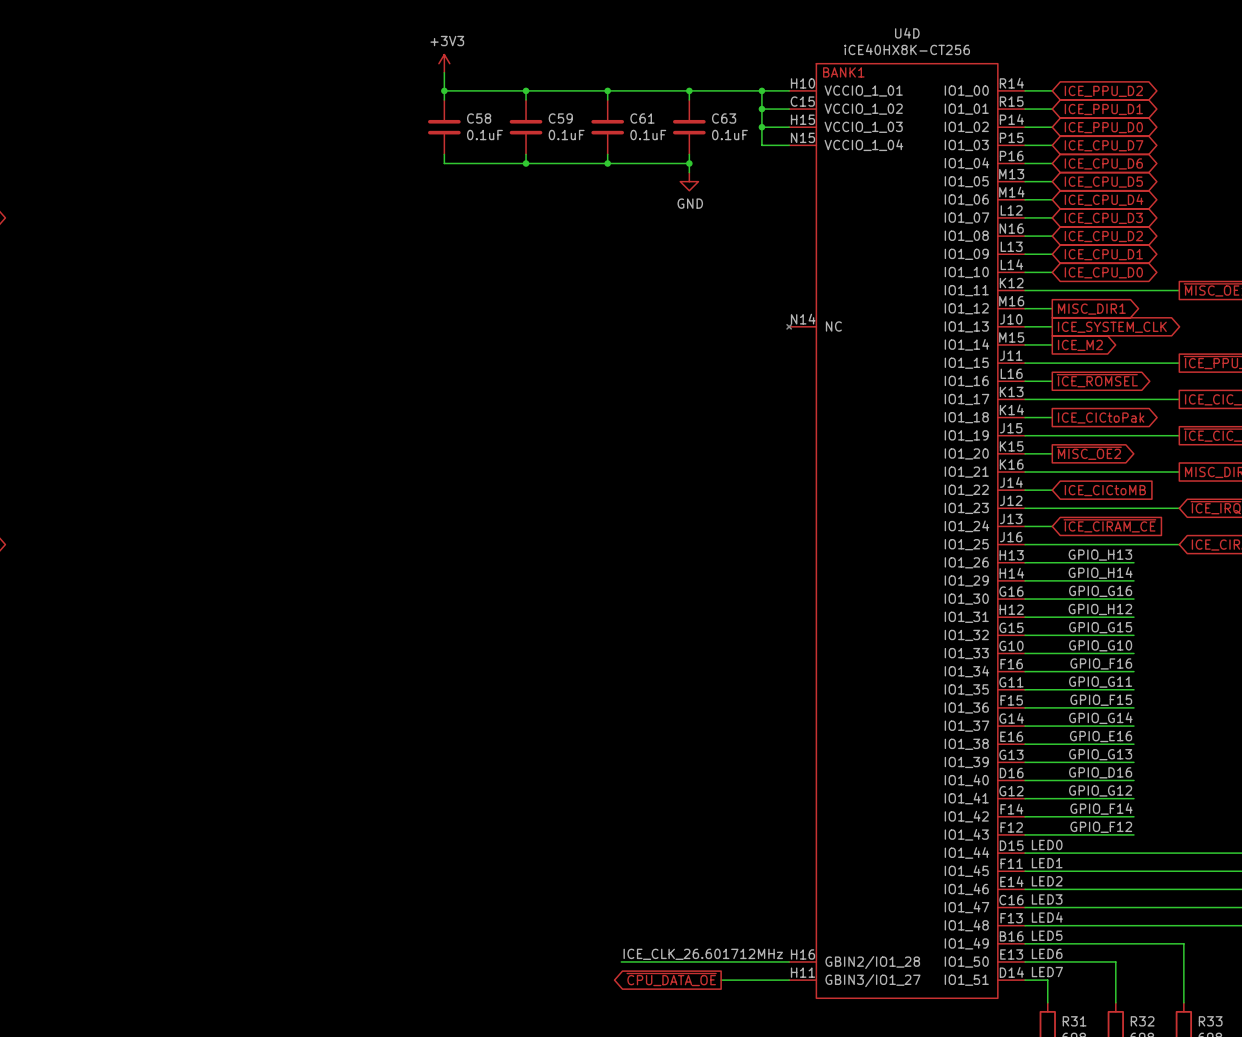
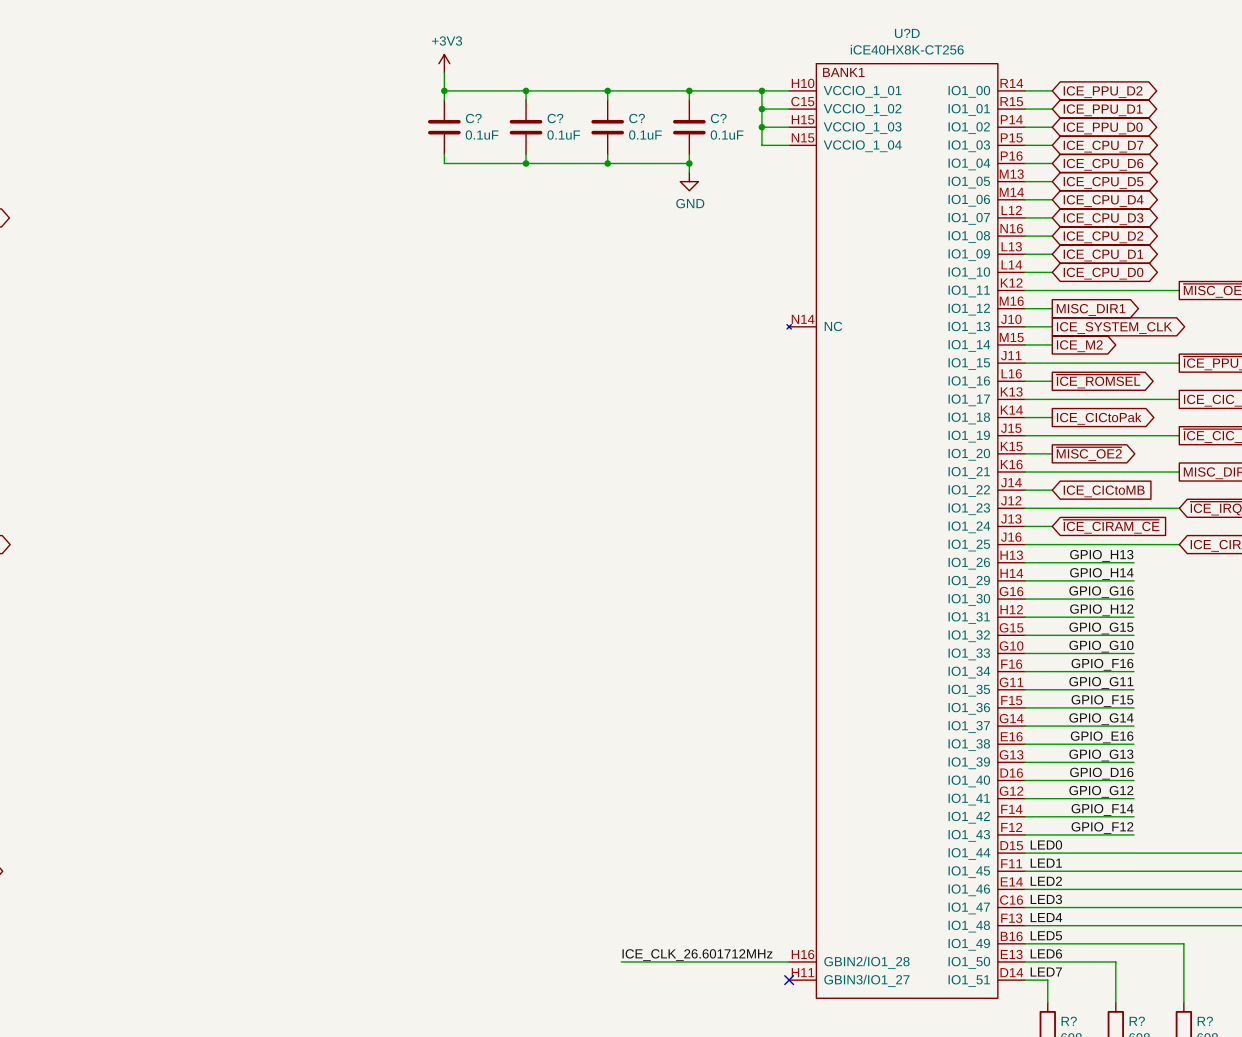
U4D name: U4D (907, 33) -> U?D (907, 33)
C58 name: C58 (479, 118) -> C? (473, 118)
C59 name: C59 (560, 118) -> C? (555, 118)
C61 name: C61 (642, 118) -> C? (637, 118)
C63 name: C63 (724, 118) -> C? (718, 118)
global label: ~{CPU_DATA_OE} (671, 979) -> none
wire: (721, 980) (789, 980) -> none
no-connect mark: none -> (789, 980)
R31 name: R31 (1074, 1021) -> R? (1069, 1021)
R32 name: R32 (1142, 1021) -> R? (1137, 1021)
R33 name: R33 (1210, 1021) -> R? (1205, 1021)

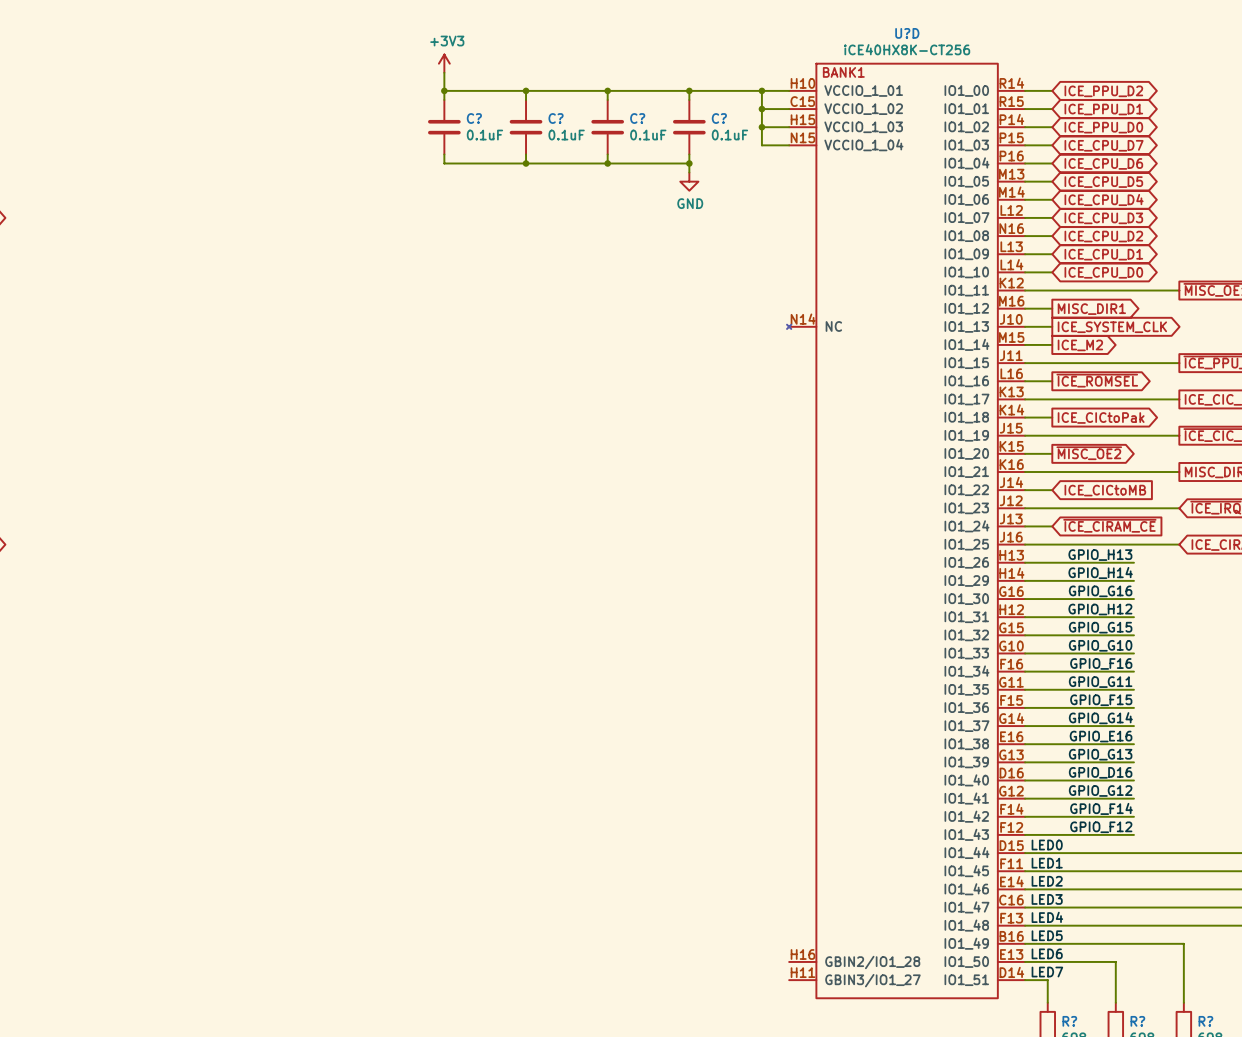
label: ICE_CLK_26.601712MHz (697, 955) -> none
wire: (621, 961) (789, 961) -> none
no-connect mark: (789, 980) -> none

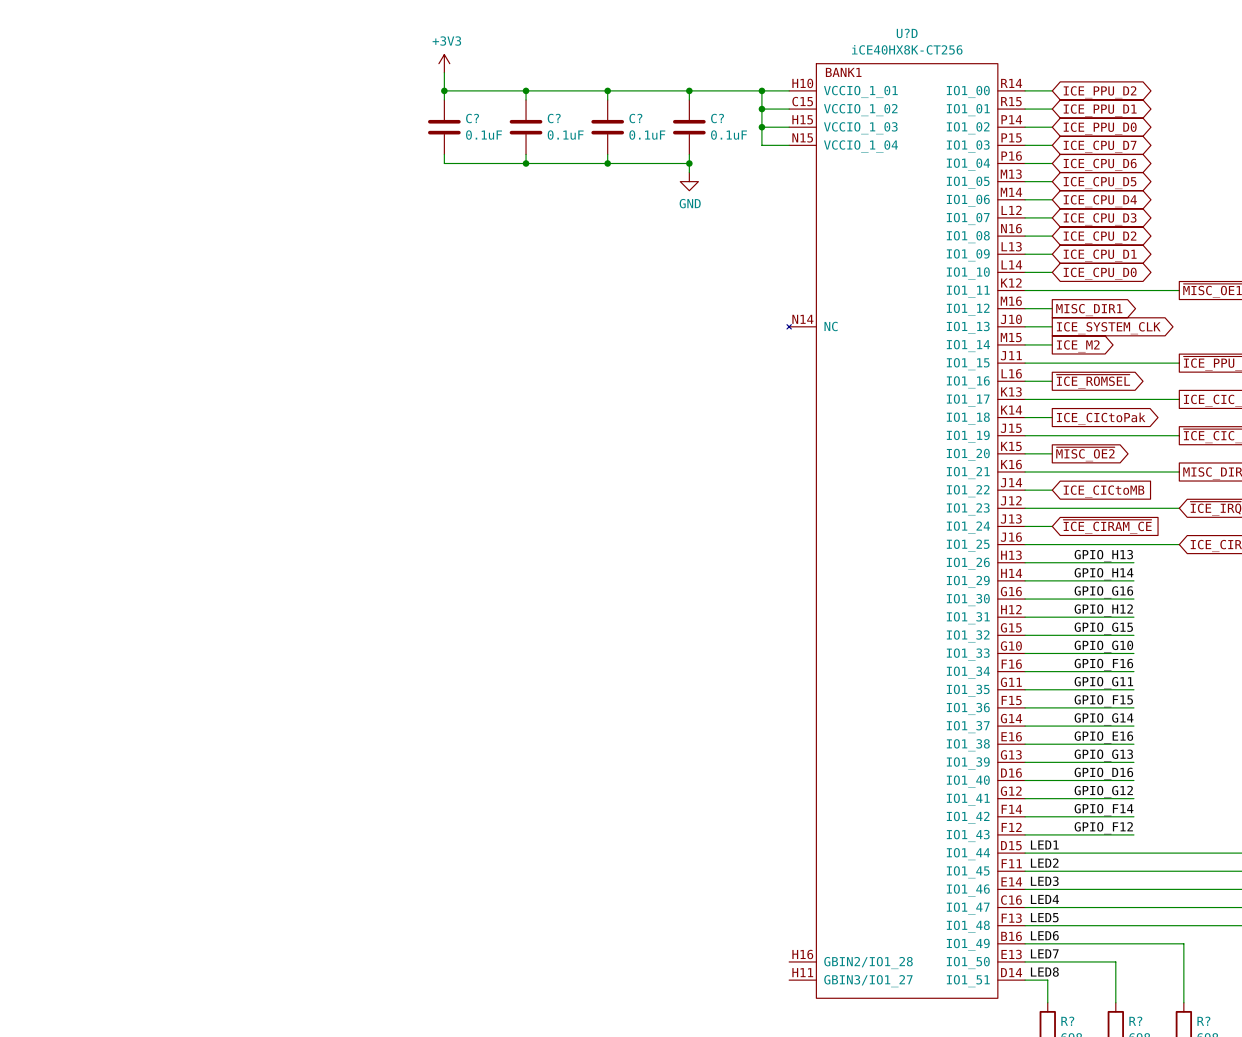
label: LED0 (1047, 844) -> LED1 (1044, 844)
label: LED1 (1047, 863) -> LED2 (1044, 863)
label: LED2 (1047, 881) -> LED3 (1044, 881)
label: LED3 (1047, 899) -> LED4 (1044, 899)
label: LED4 (1047, 917) -> LED5 (1044, 917)
label: LED5 (1047, 935) -> LED6 (1044, 935)
label: LED6 (1047, 953) -> LED7 (1044, 953)
label: LED7 (1047, 972) -> LED8 (1044, 972)

